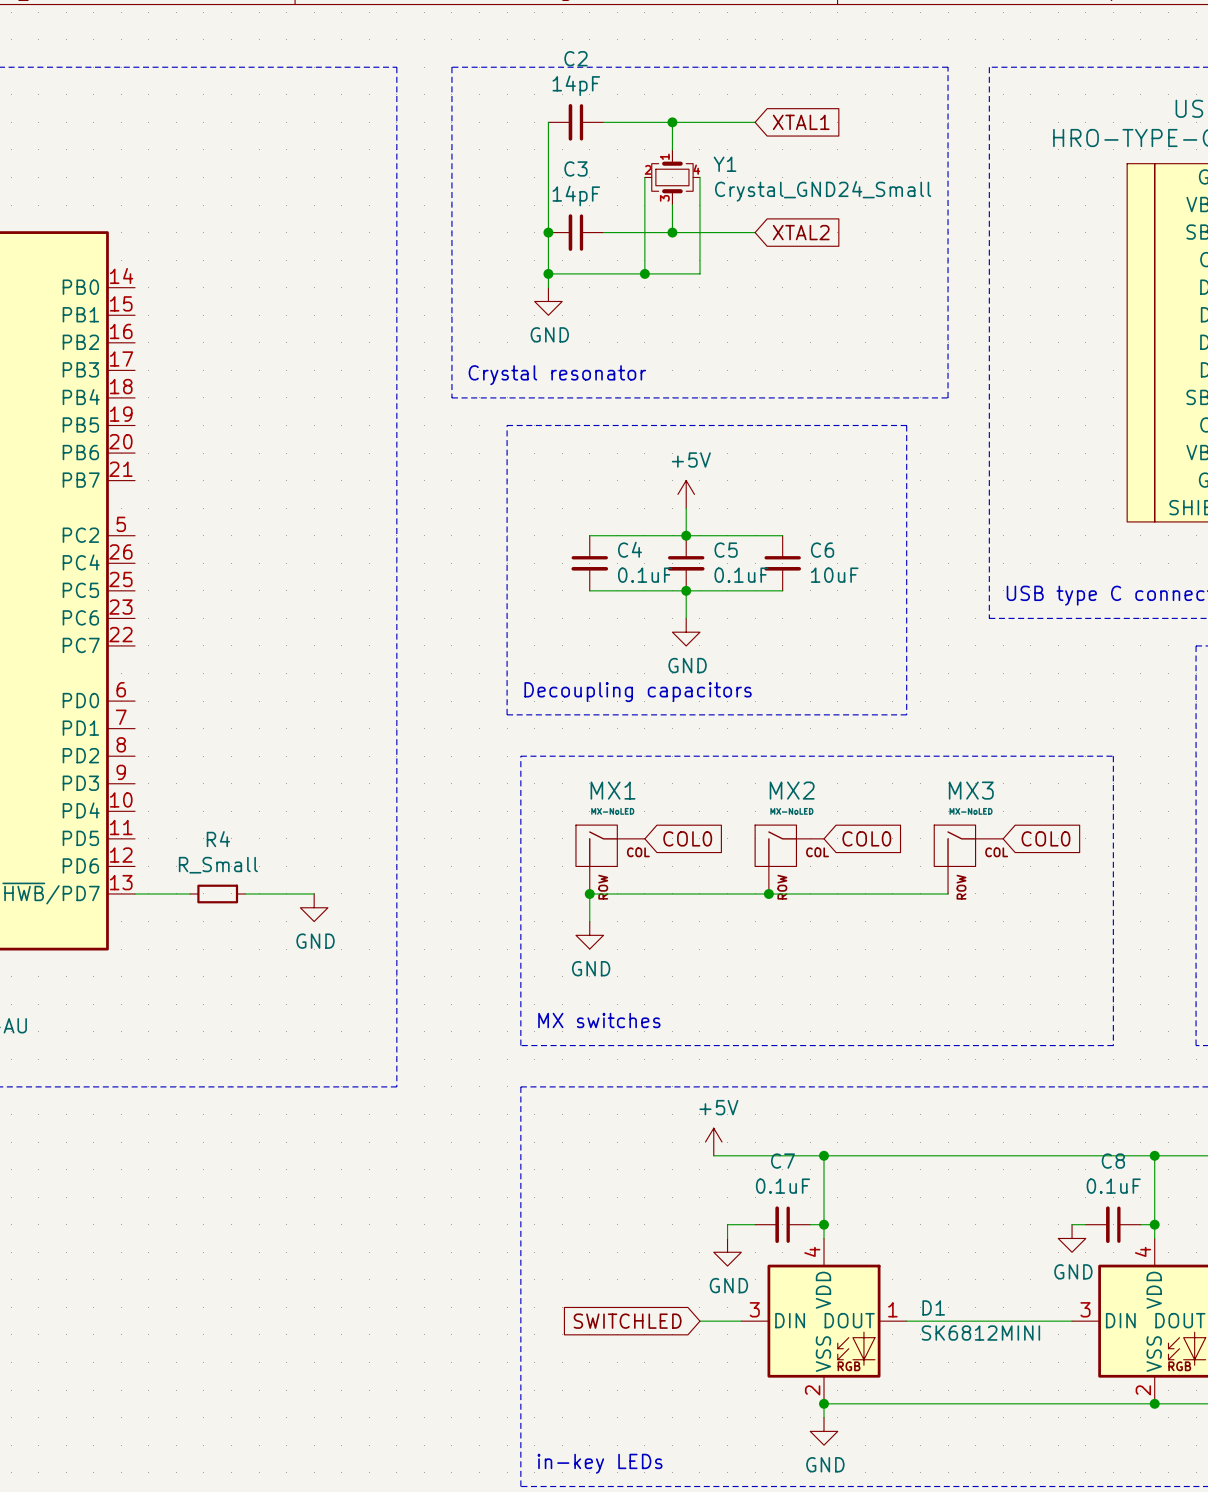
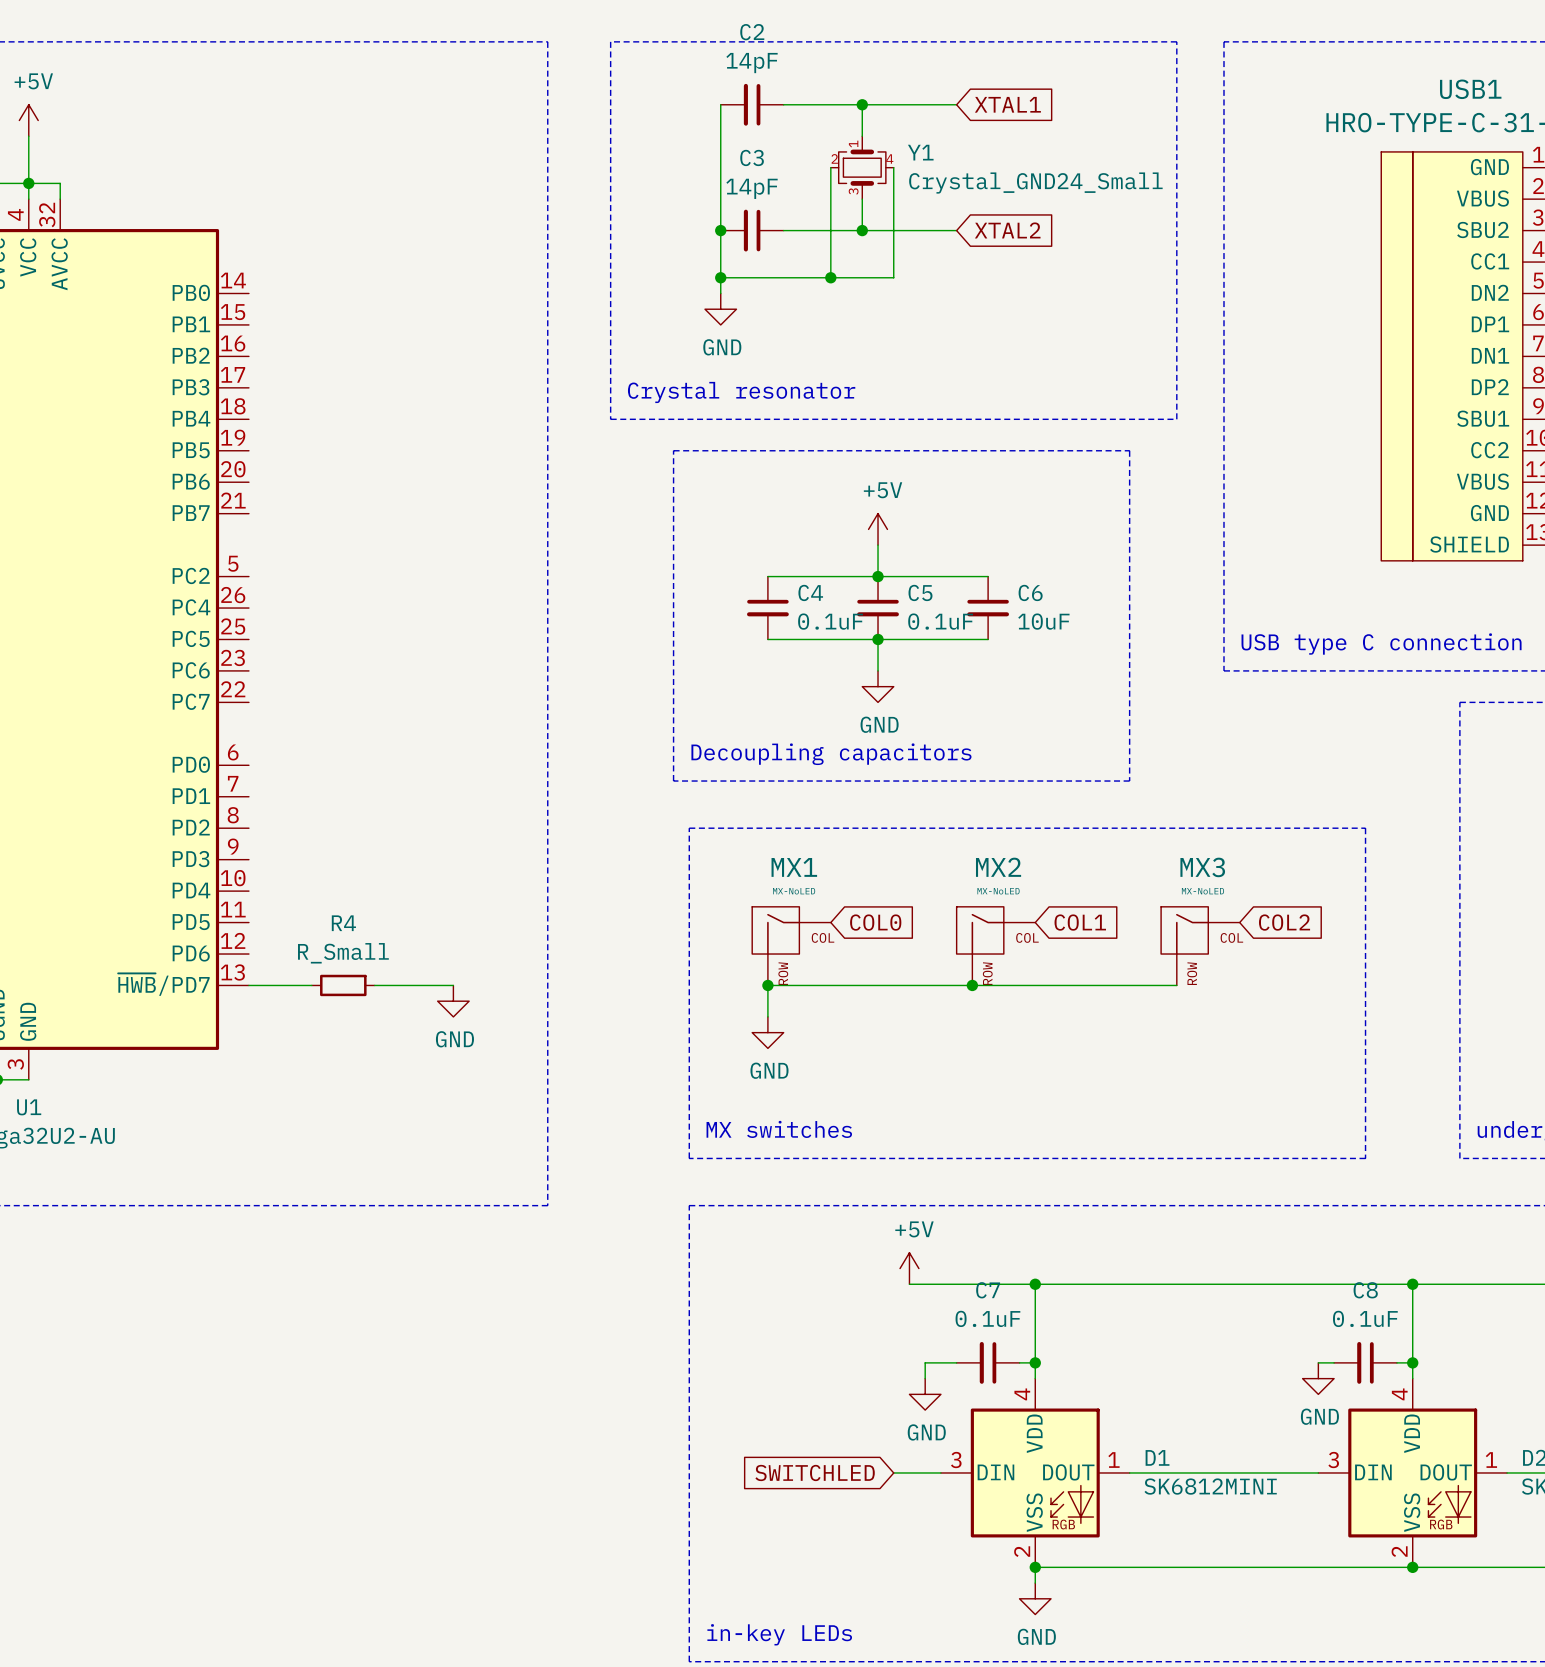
global label: COL0 (866, 838) -> COL1 (1080, 922)
global label: COL0 (1045, 838) -> COL2 (1284, 922)

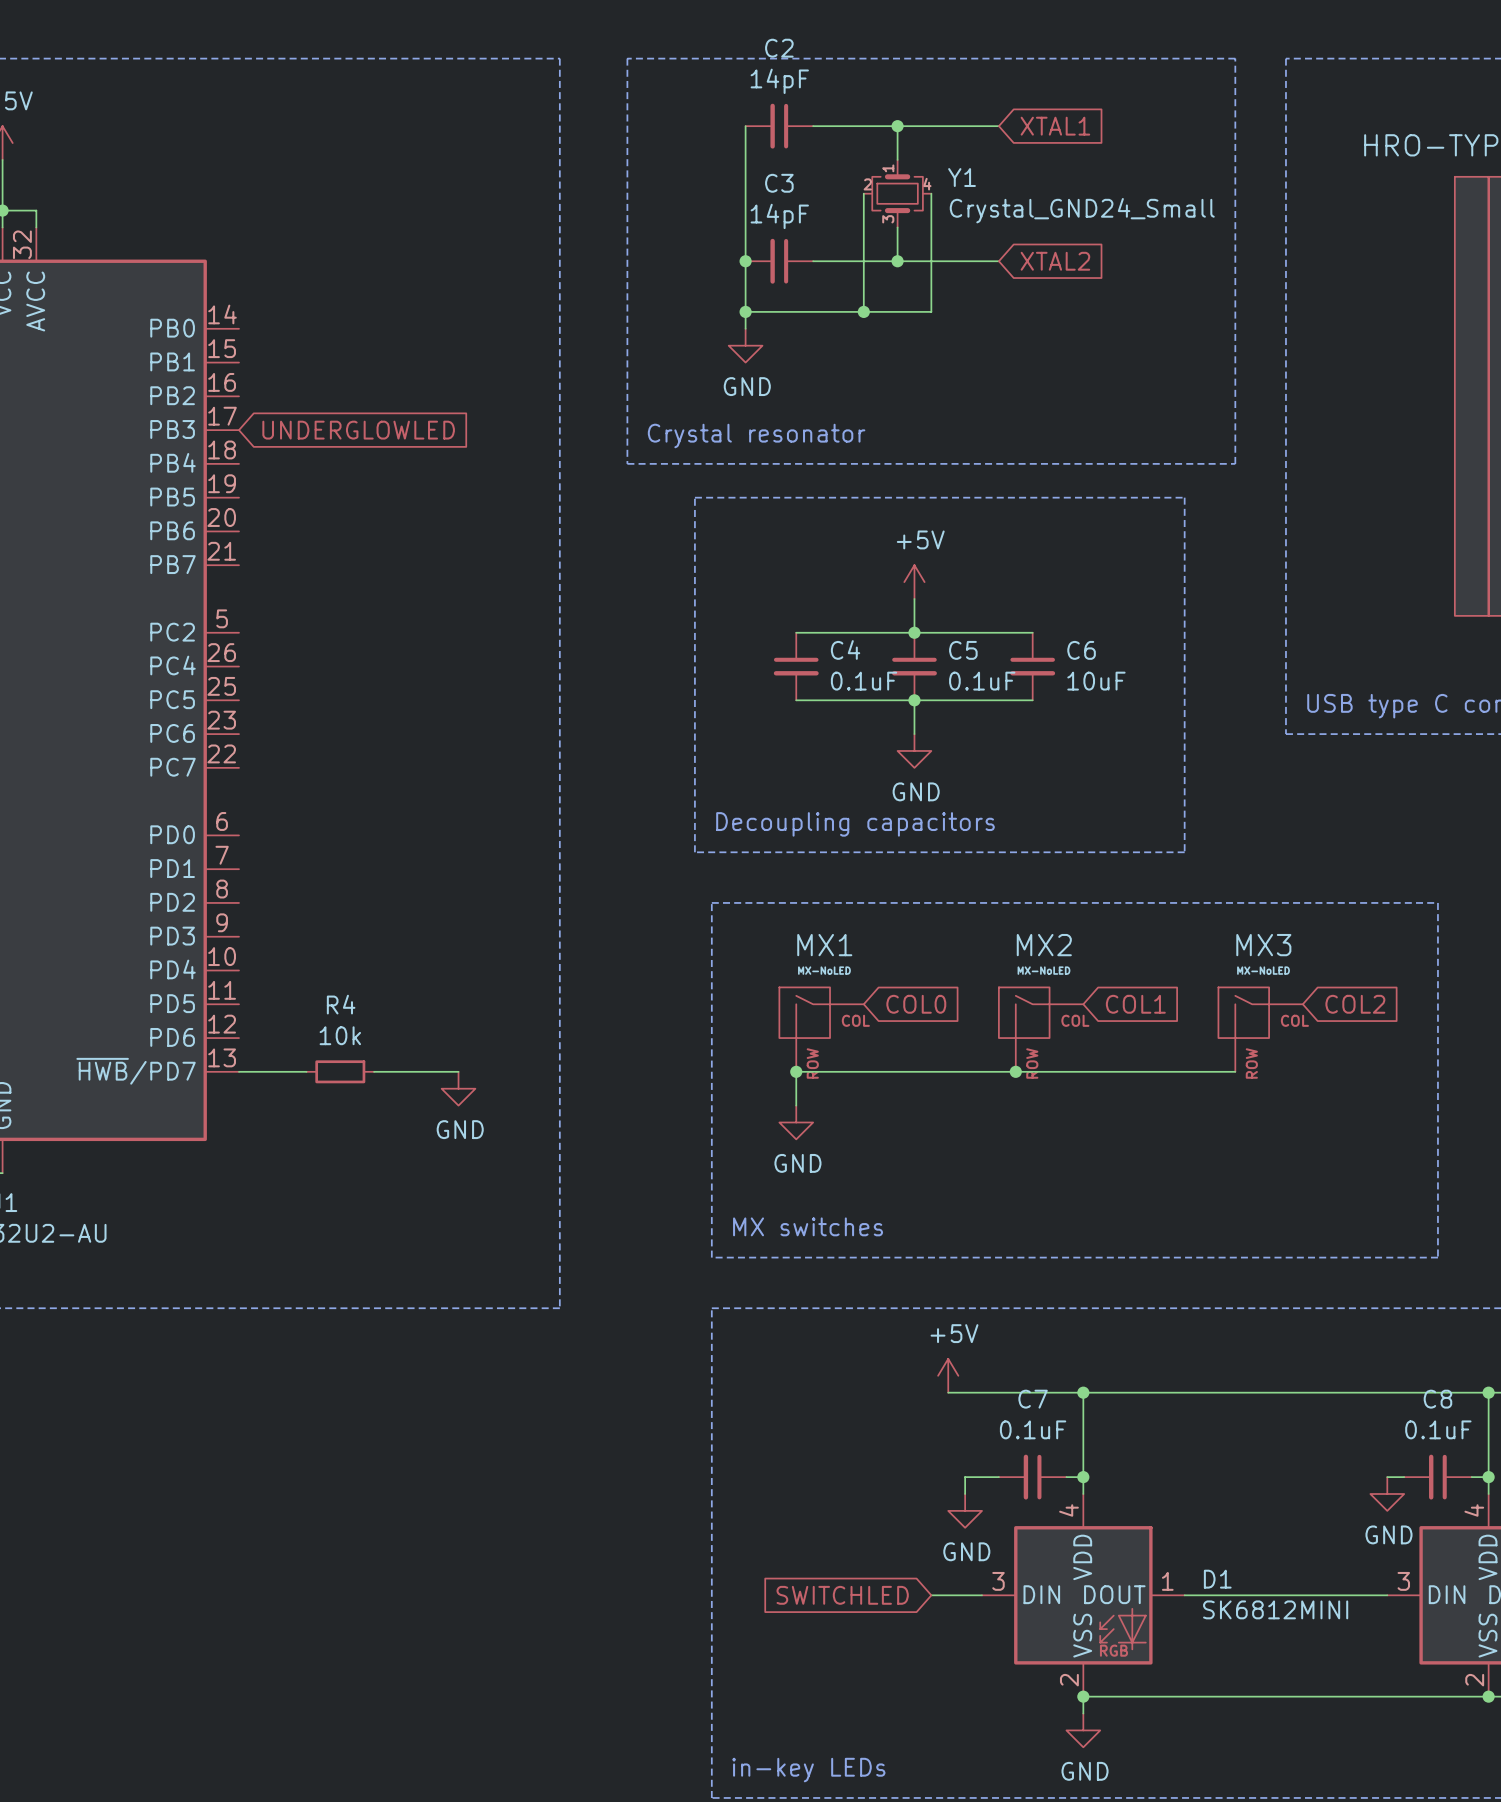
global label: none -> UNDERGLOWLED (358, 430)
R4 value: R_Small (343, 953) -> 10k (340, 1035)

